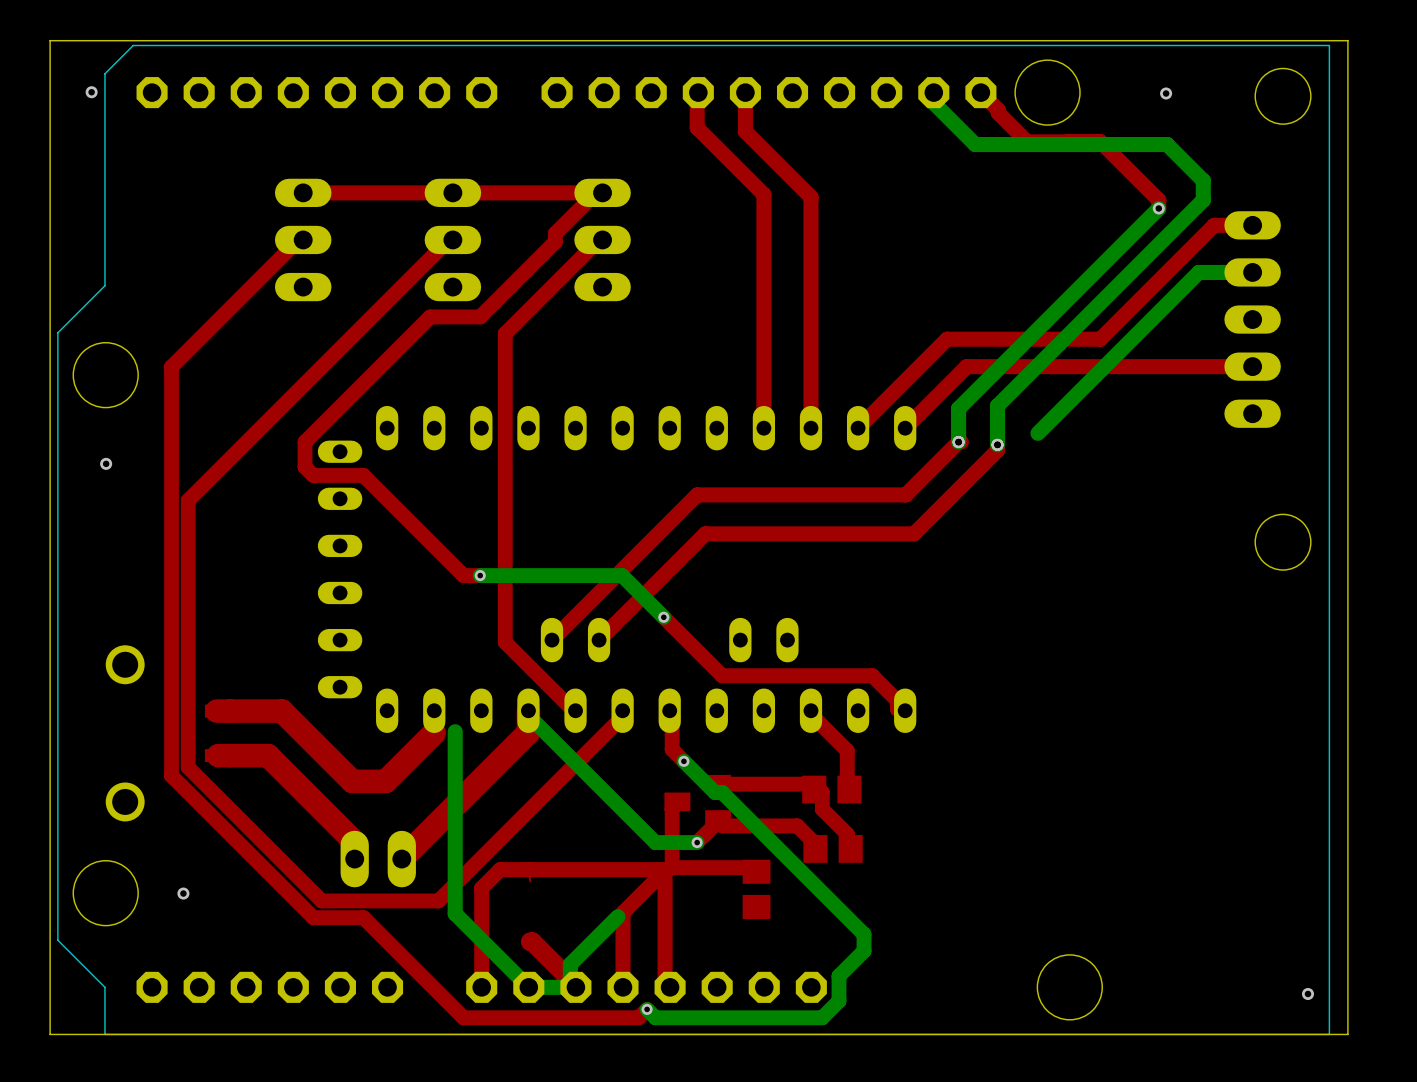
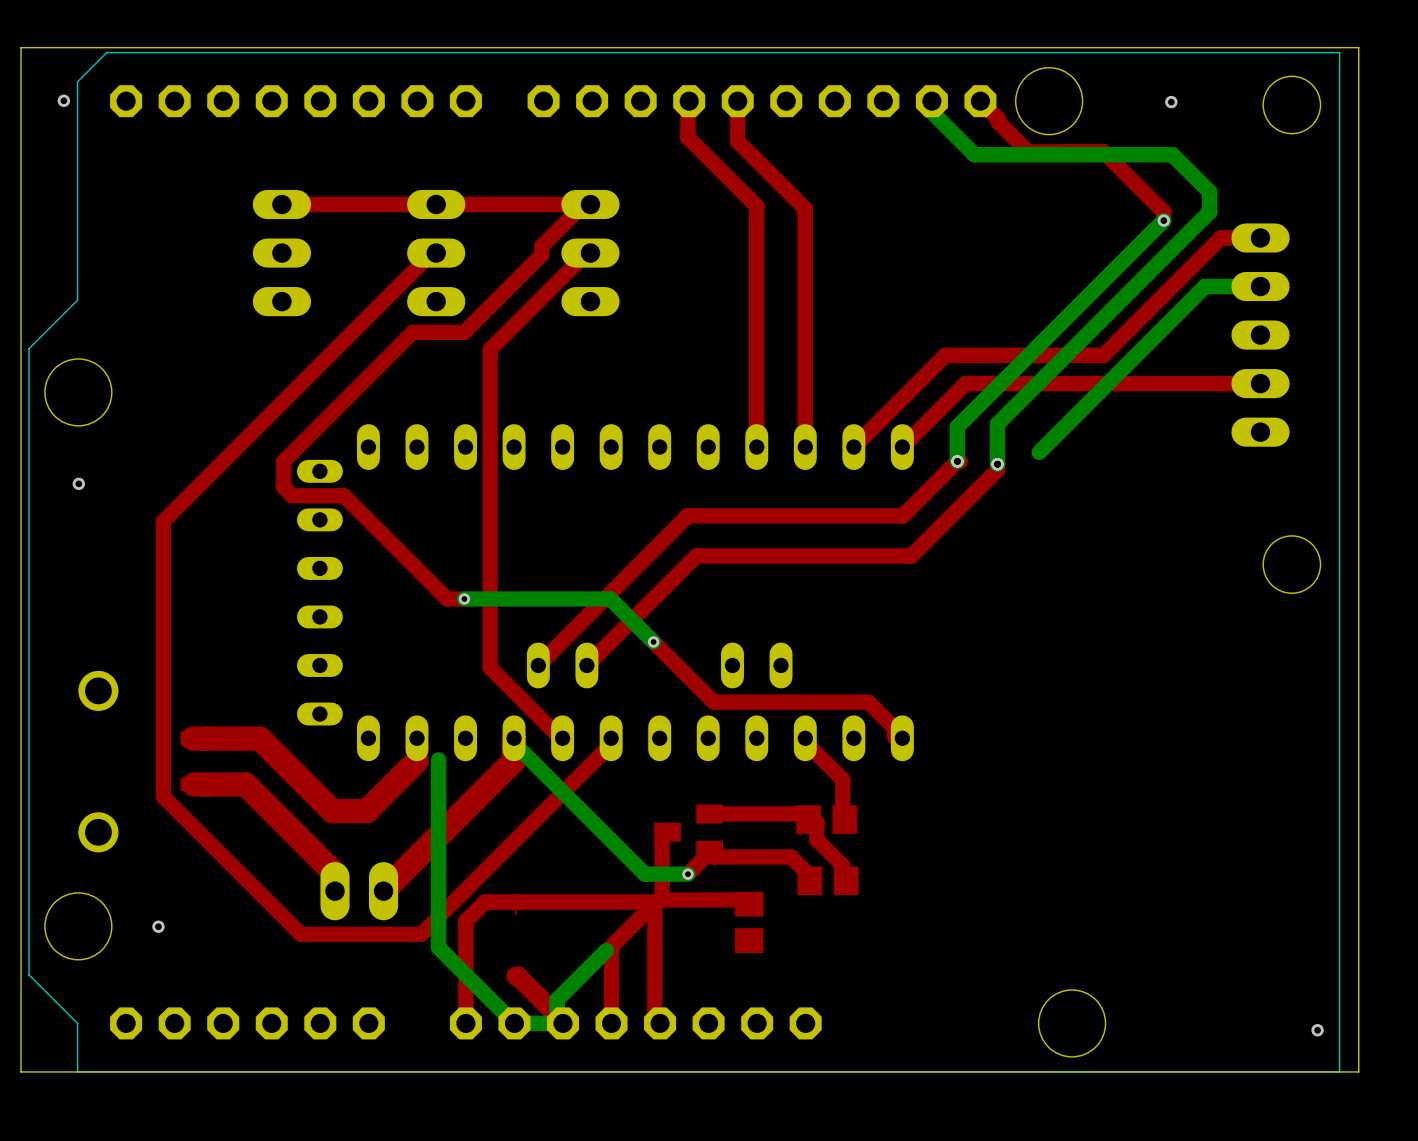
top track: (303, 239) (296, 241) (171, 367) (171, 775) (313, 917) (363, 917) (463, 1017) (638, 1017) (647, 1009) -> none
top track: (669, 710) (672, 717) (672, 749) (683, 761) -> none
bottom track: (683, 761) (715, 792) (722, 792) (864, 934) (864, 951) (838, 976) (838, 1001) (822, 1017) (655, 1017) (647, 1009) -> none
via: (683, 761) -> none
via: (647, 1009) -> none

